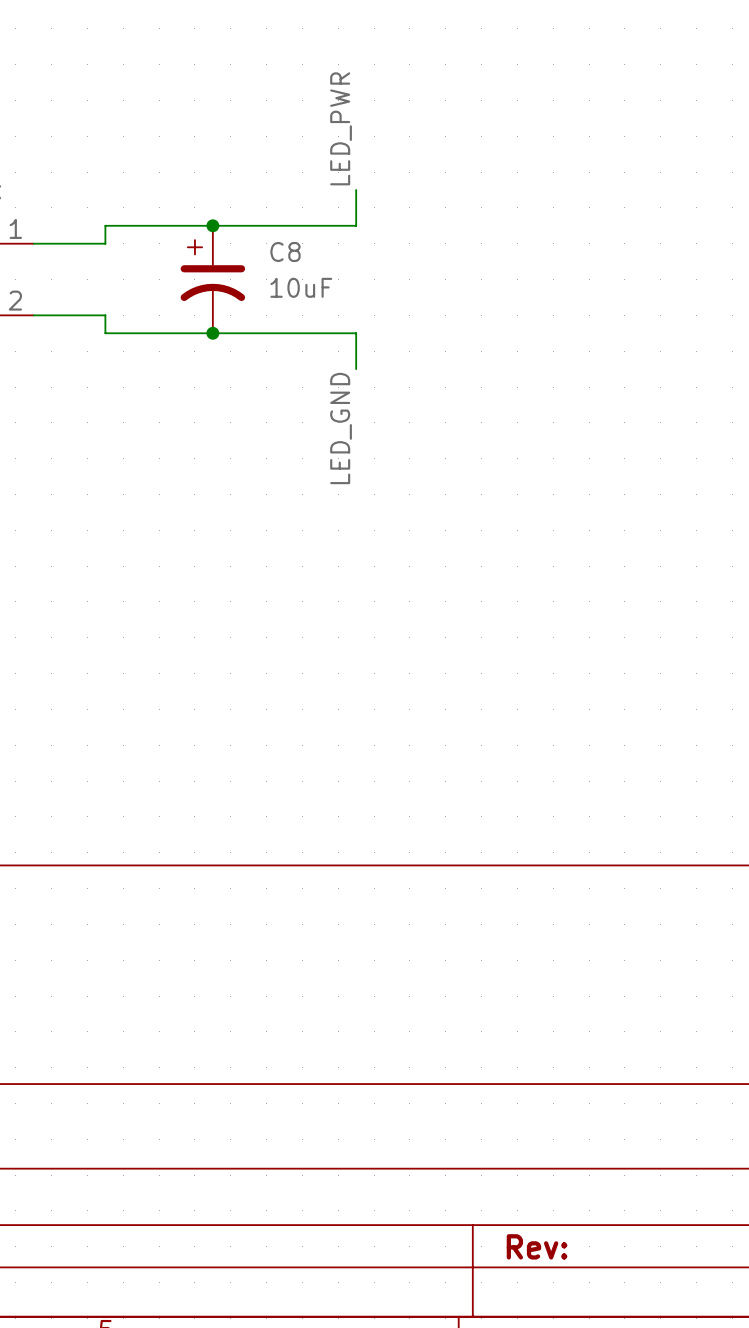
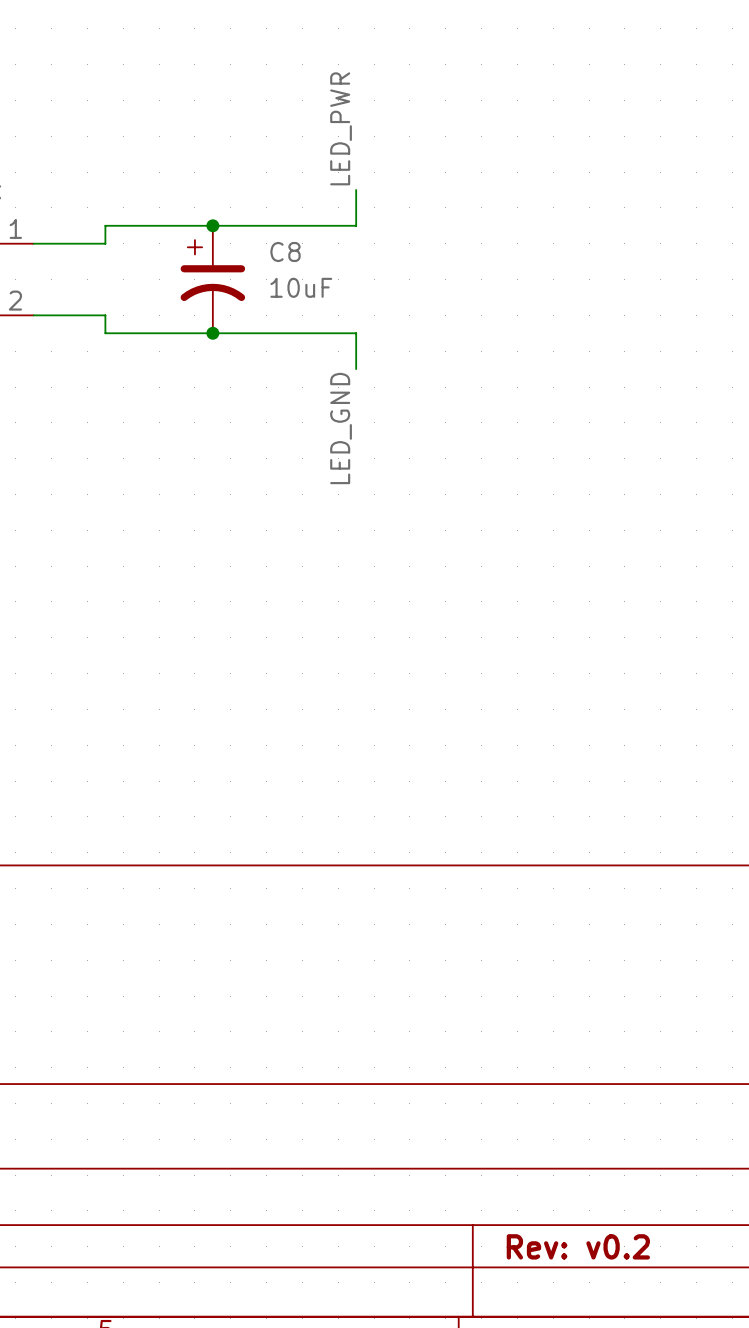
title block: Rev: (537, 1246) -> Rev: v0.2 (578, 1246)

